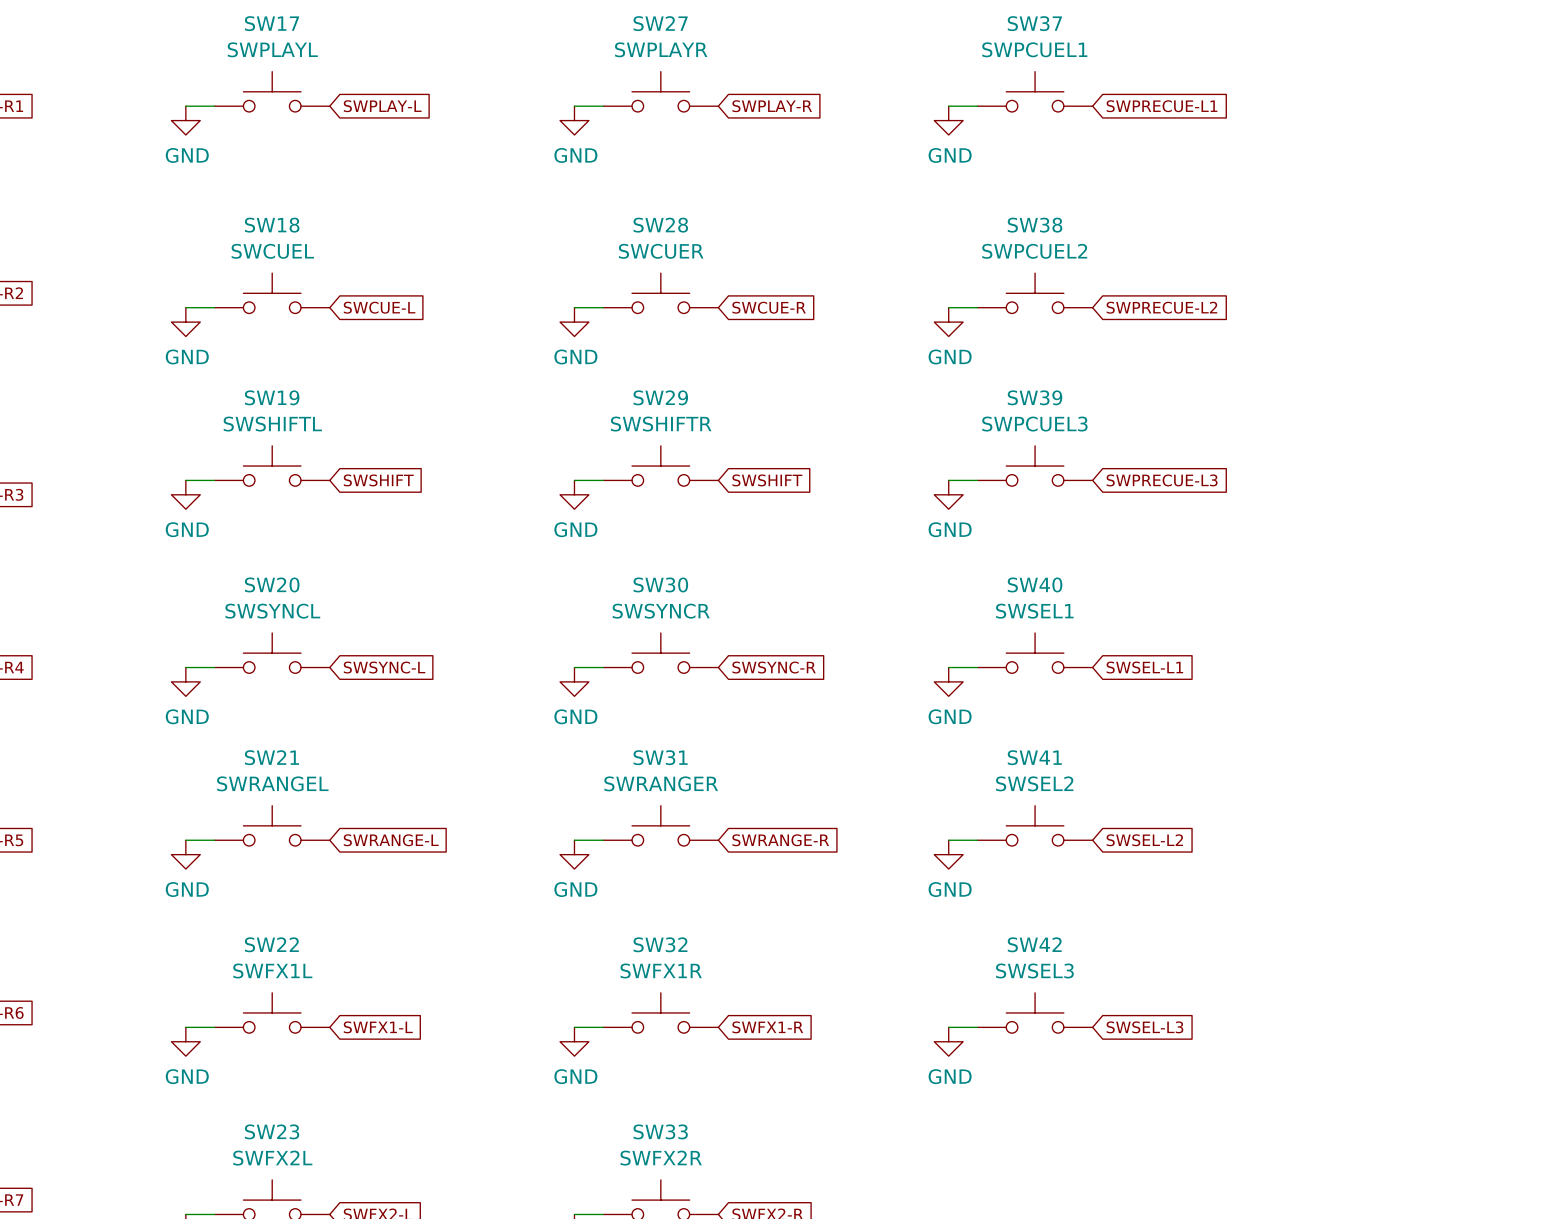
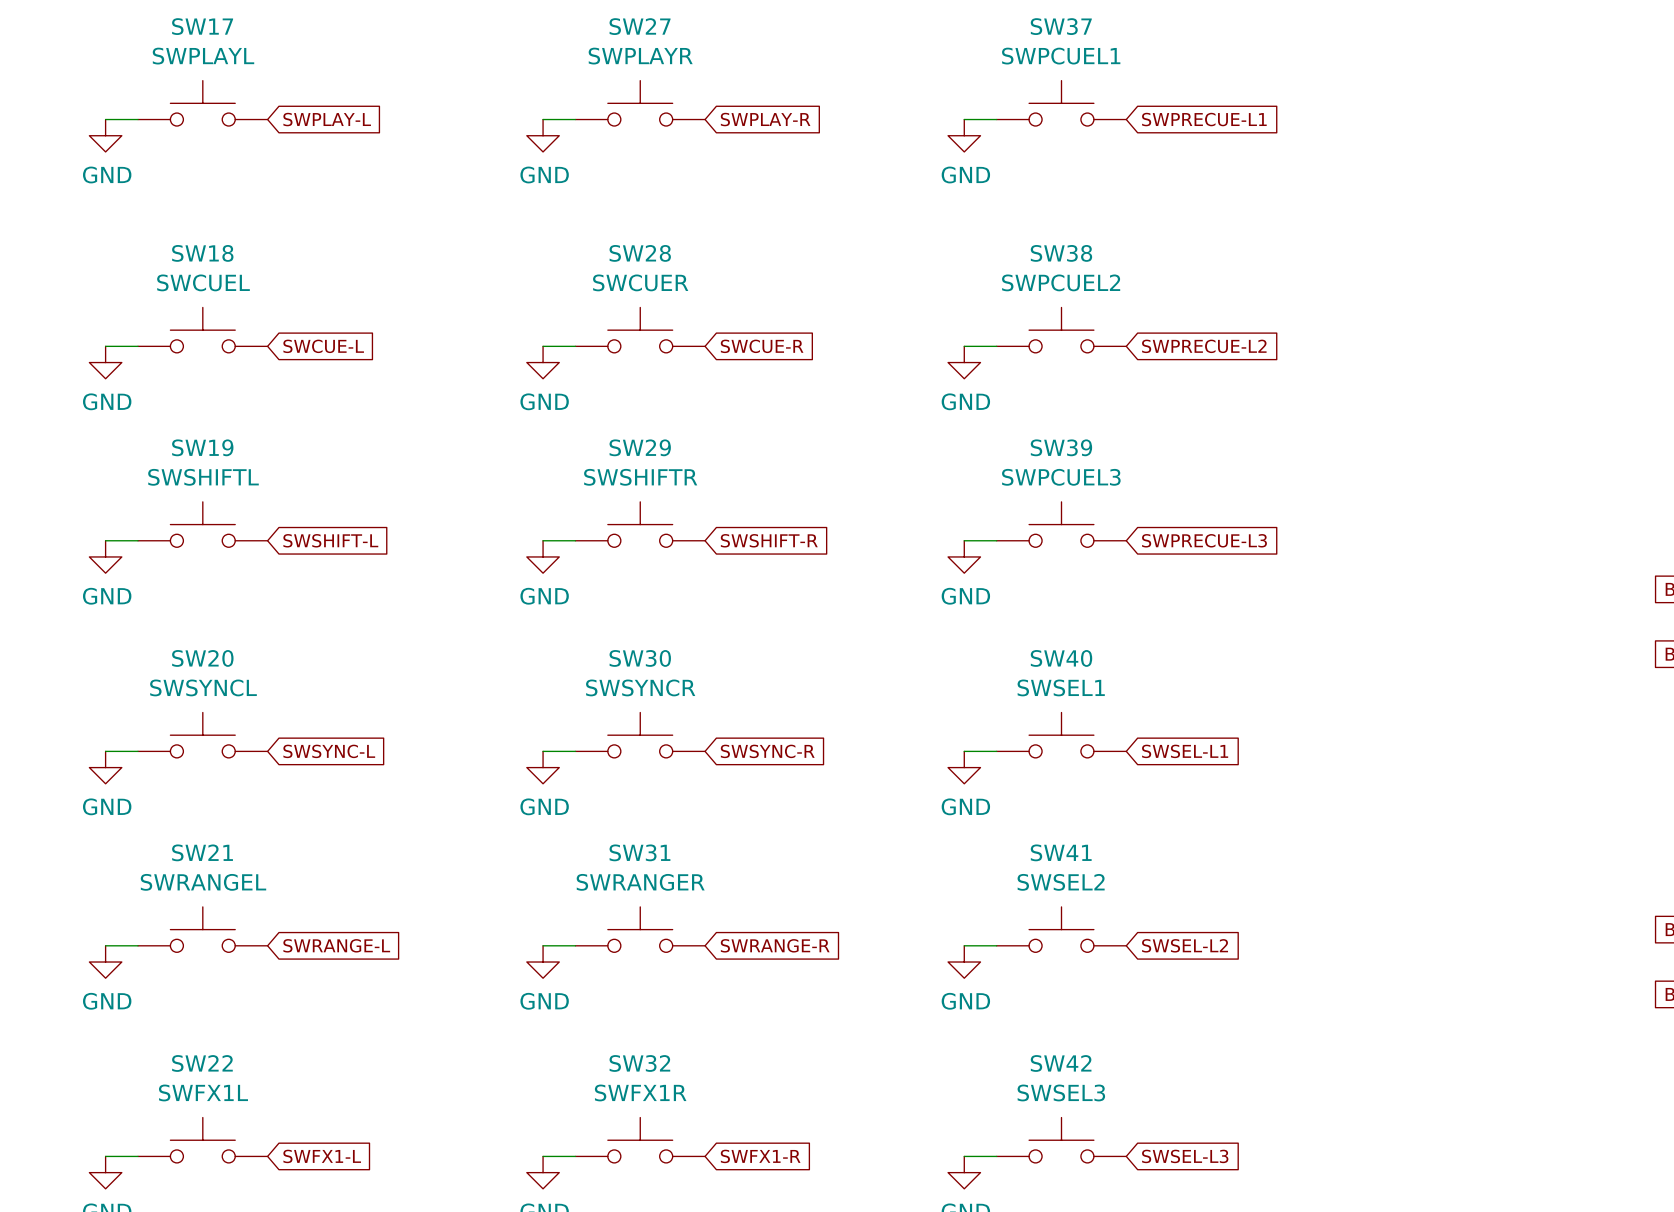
global label: SWSHIFT (378, 480) -> SWSHIFT-L (330, 540)
global label: SWSHIFT (767, 480) -> SWSHIFT-R (769, 540)

